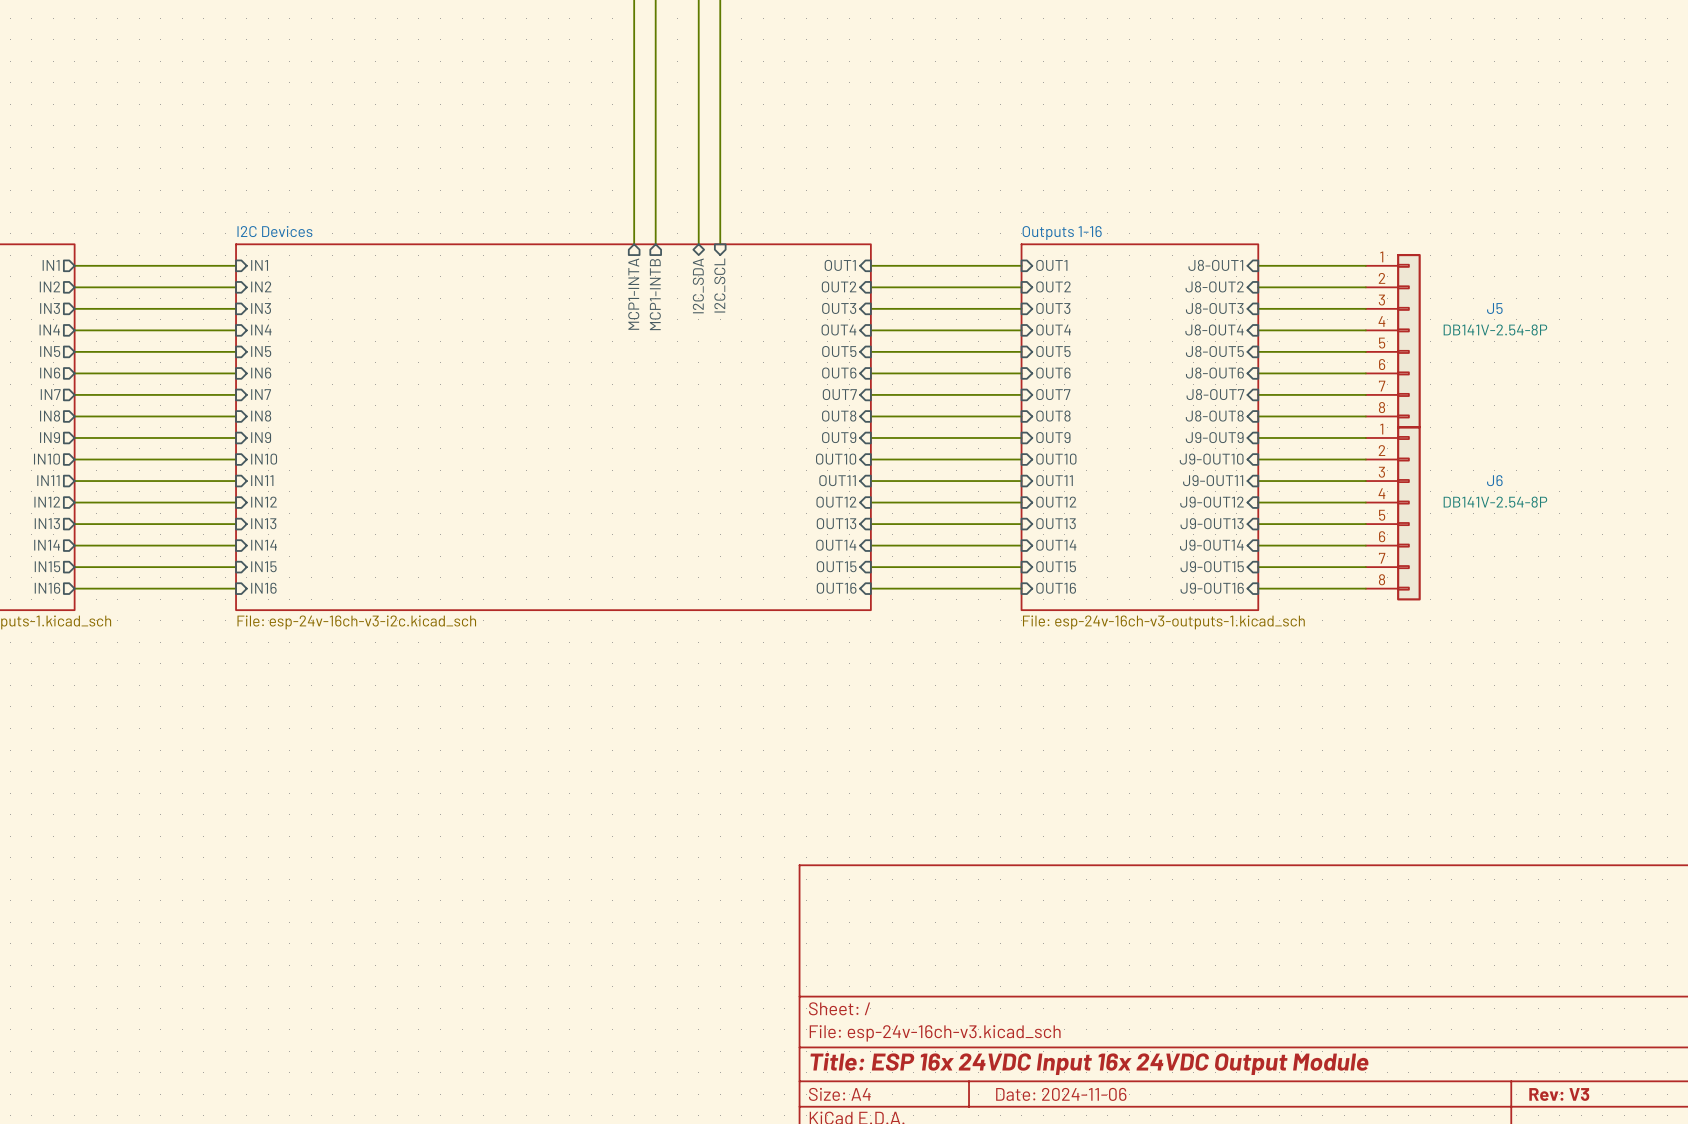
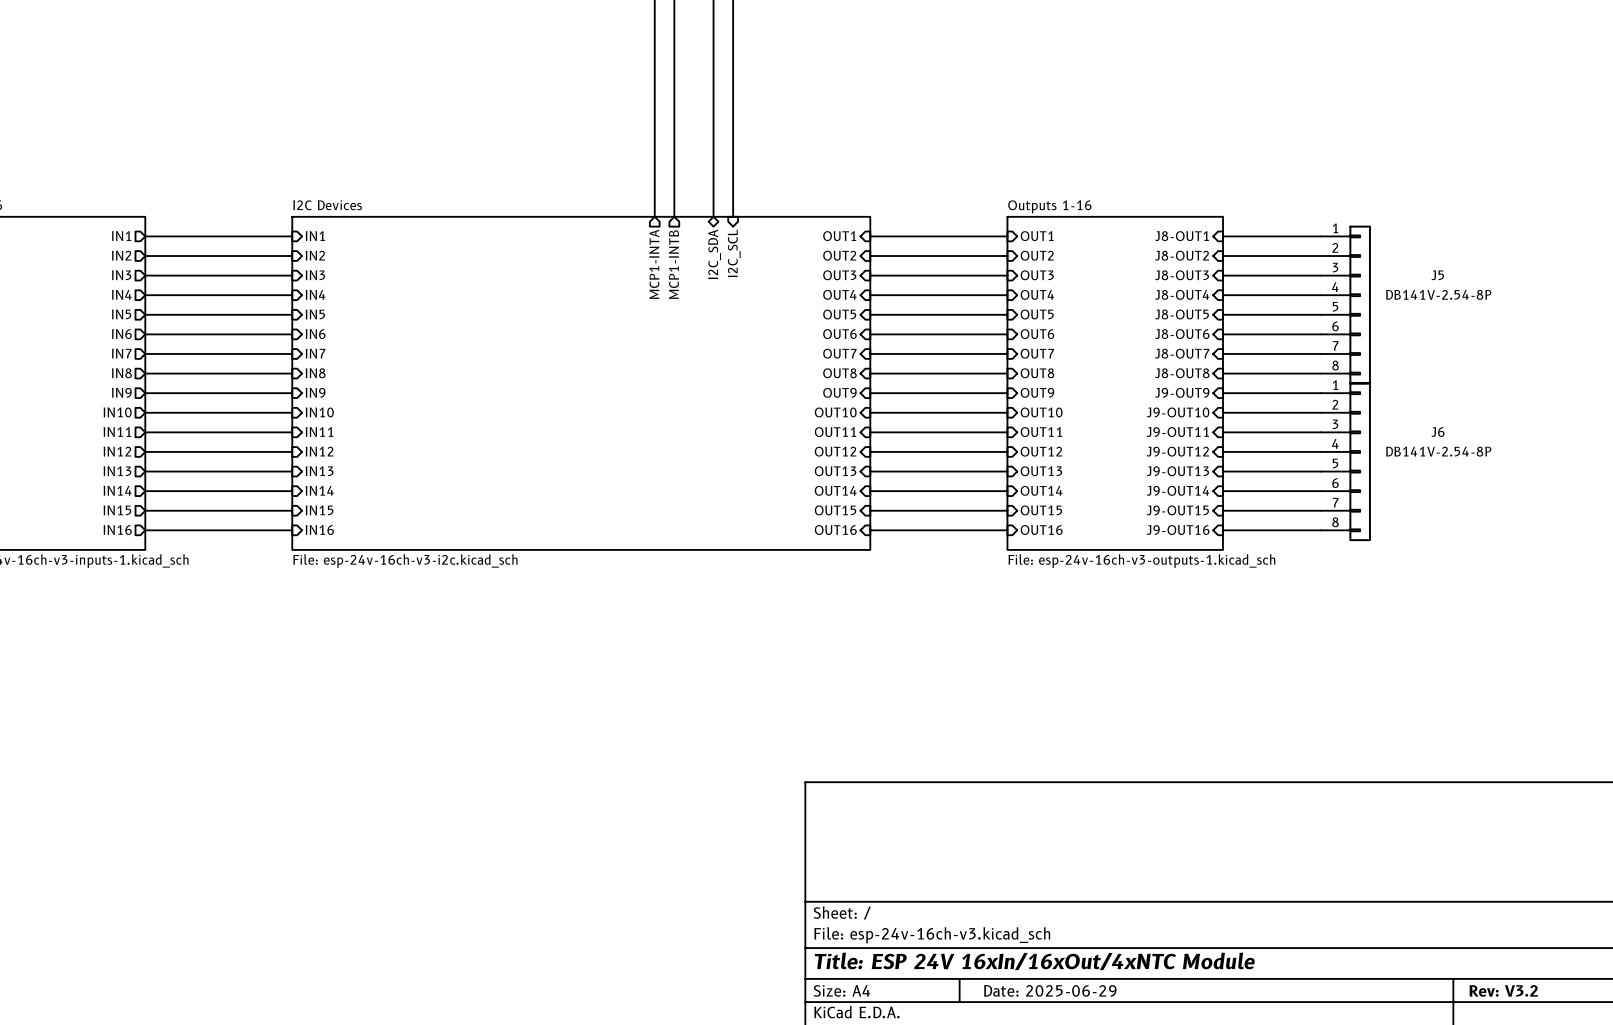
title block: Title: ESP 16x 24VDC Input 16x 24VDC Output Module (1089, 1063) -> Title: ESP 24V 16xIn/16xOut/4xNTC Module (1034, 961)
title block: Date: 2024-11-06 (1061, 1094) -> Date: 2025-06-29 (1050, 990)
title block: Rev: V3 (1559, 1094) -> Rev: V3.2 (1503, 990)

